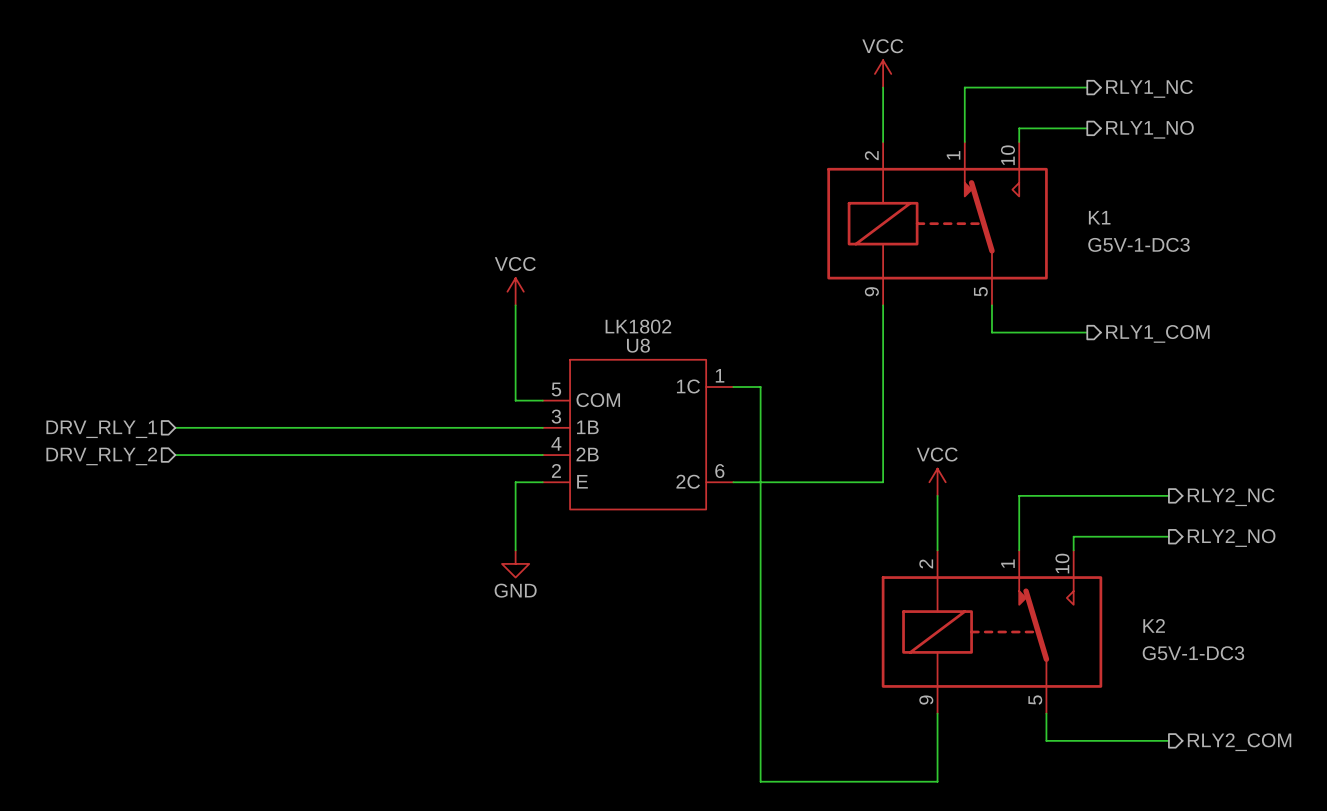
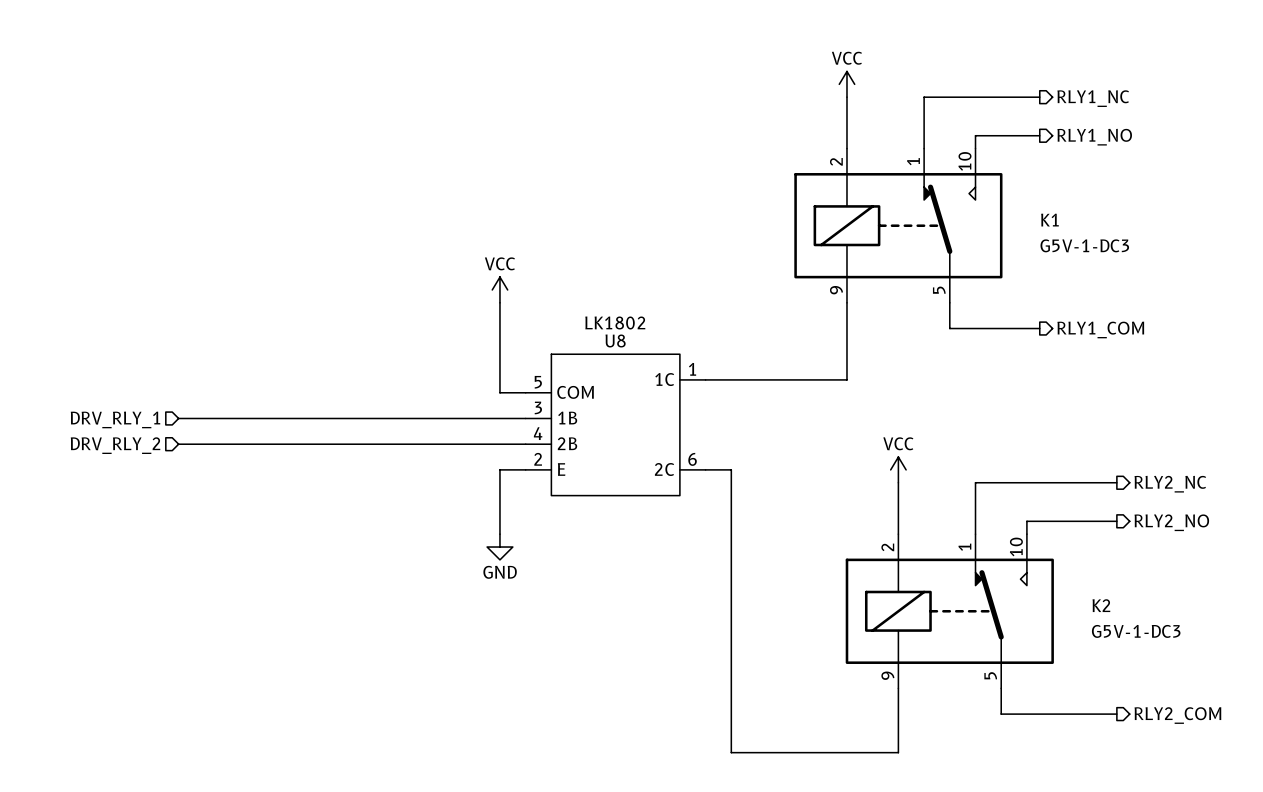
wire: (760, 387) (760, 482) (883, 482) (883, 387) -> (731, 379) (846, 379)

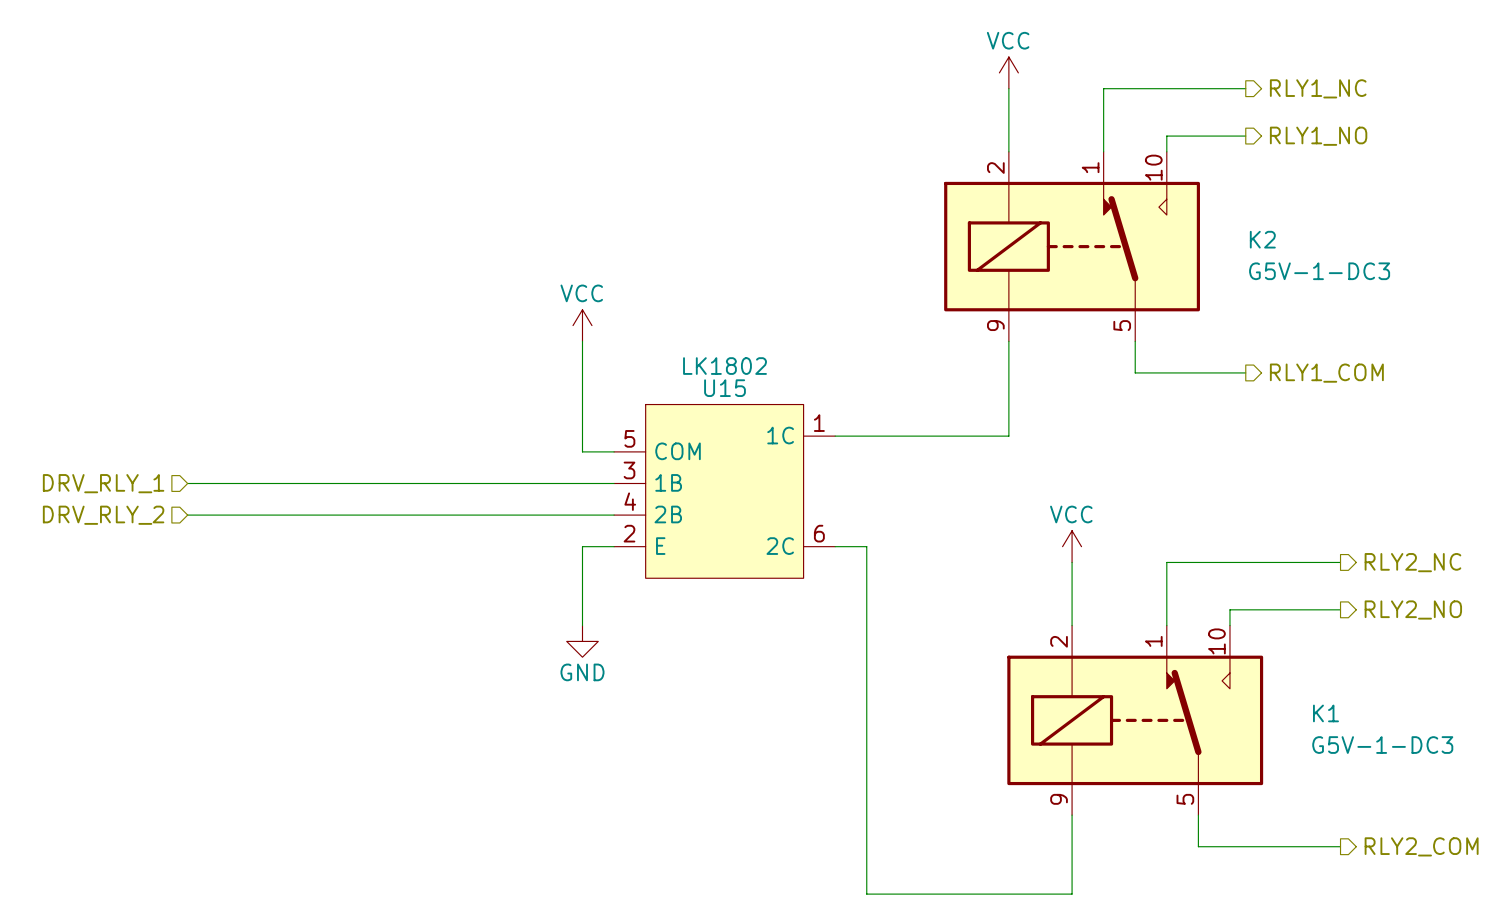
K1 name: K1 (1049, 220) -> K2 (1262, 239)
U8 name: U8 (615, 340) -> U15 (725, 388)
K2 name: K2 (1101, 605) -> K1 (1325, 713)

